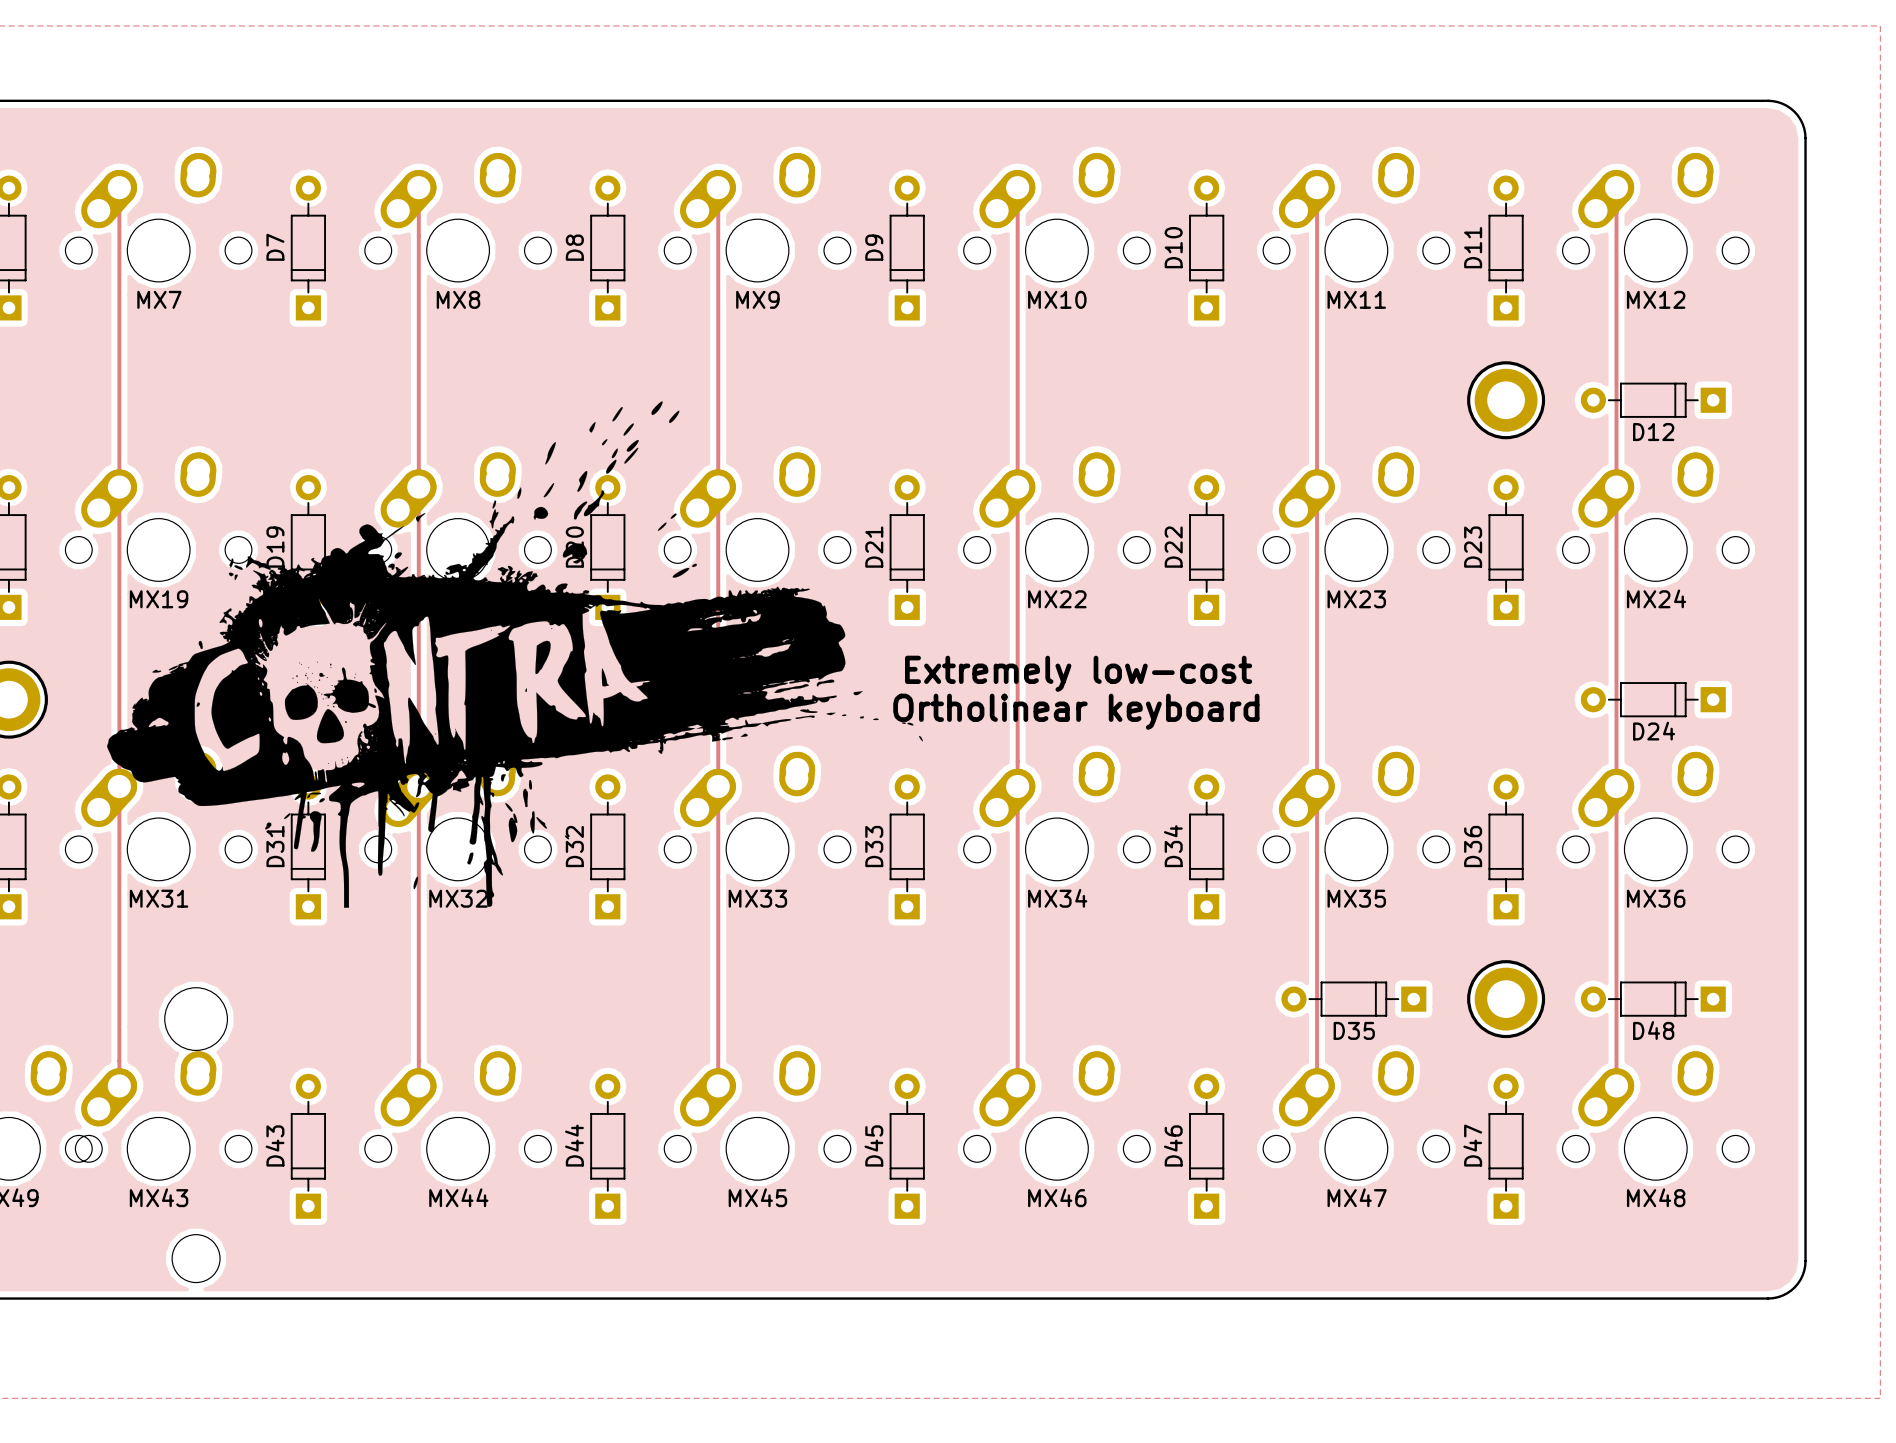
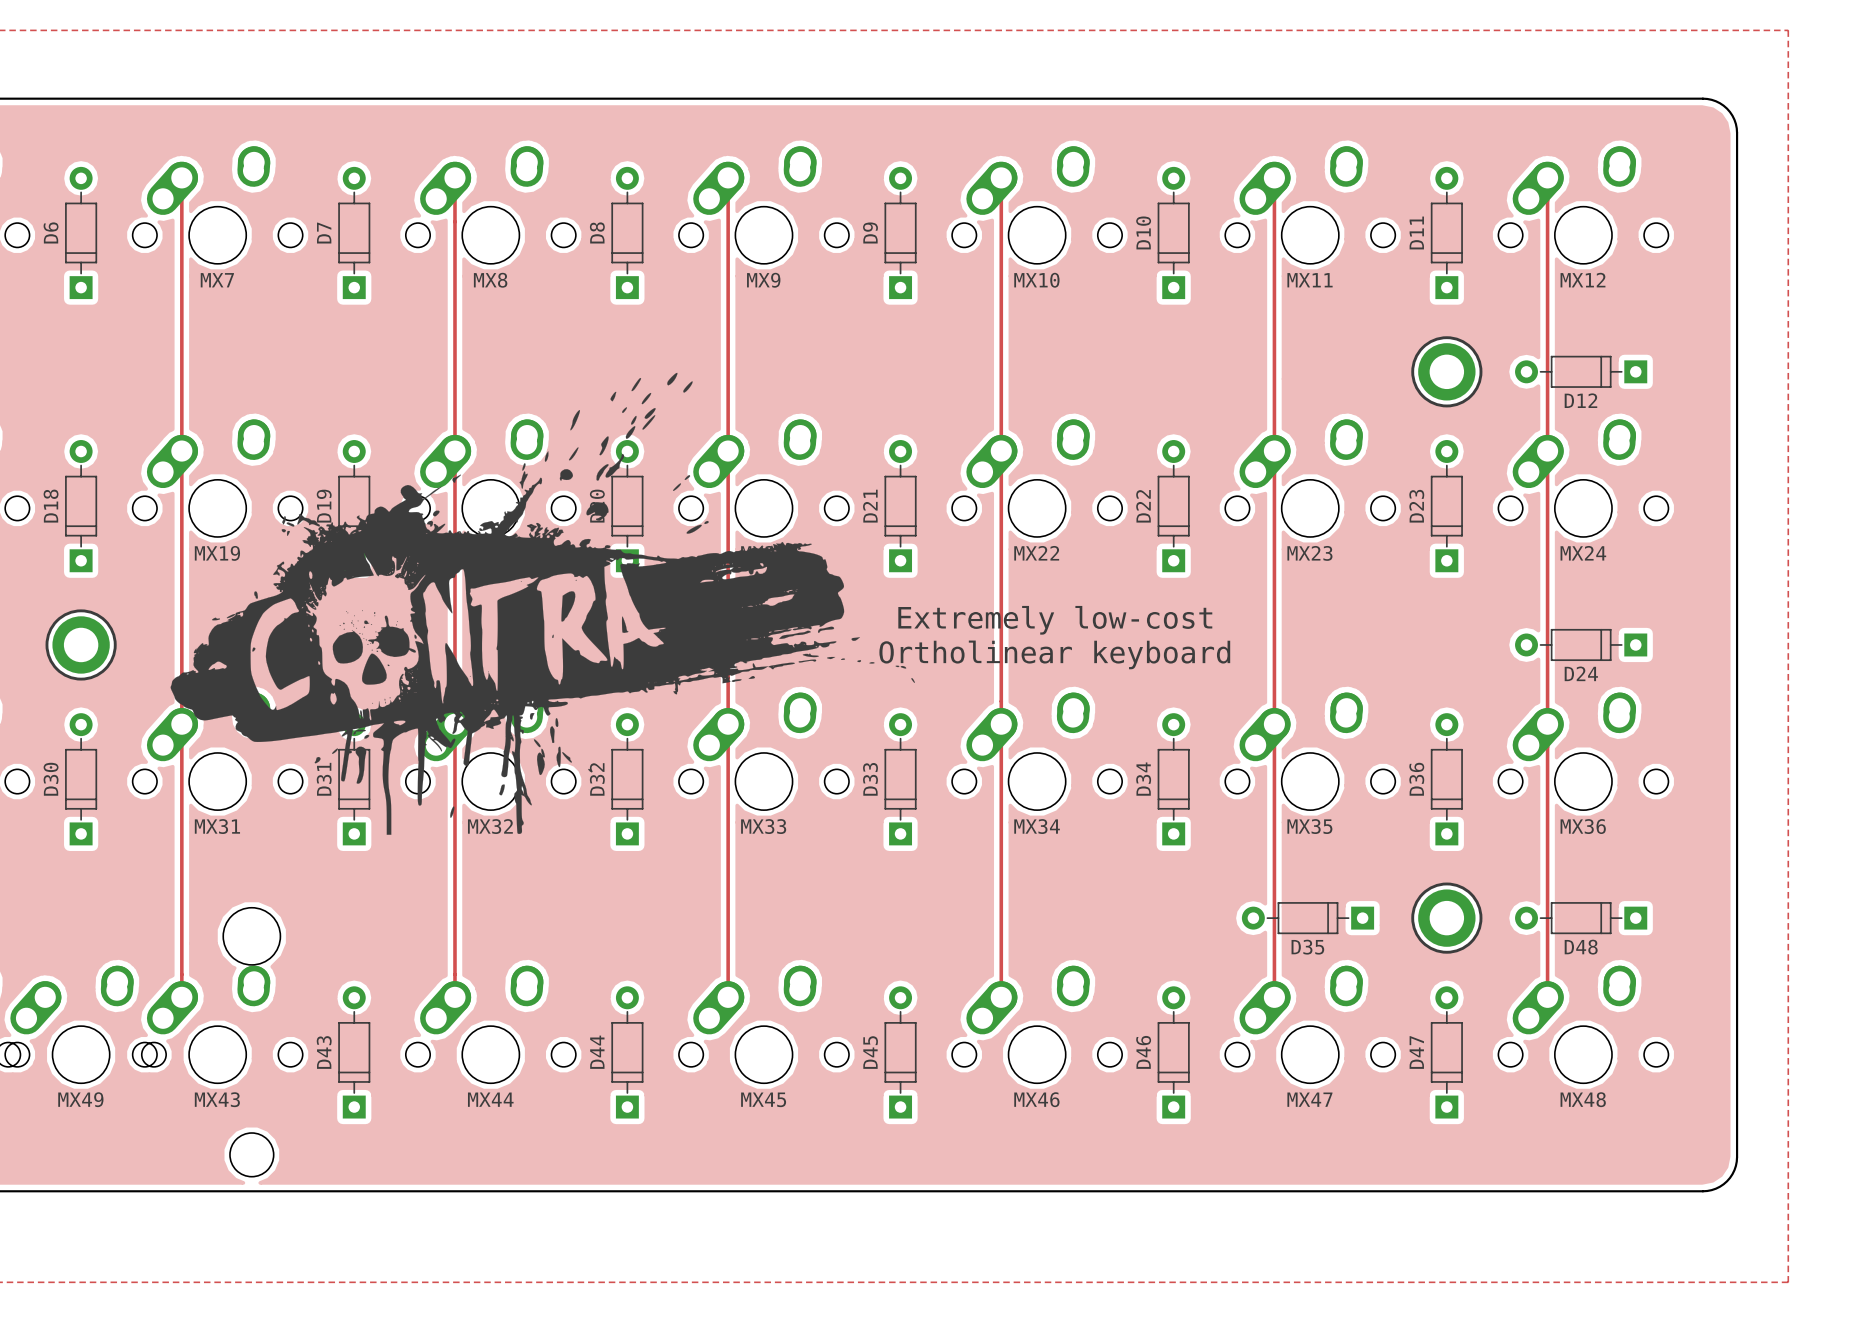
board edge: (1768, 100) (1782, 103) (1794, 111) (1802, 123) (1805, 138) (1805, 1261) (1802, 1275) (1794, 1287) (1782, 1295) (1768, 1298) -> (1685, 98) (1707, 98) (1719, 103) (1732, 115) (1737, 132) (1737, 1157) (1732, 1174) (1719, 1186) (1707, 1190) (1685, 1191)

